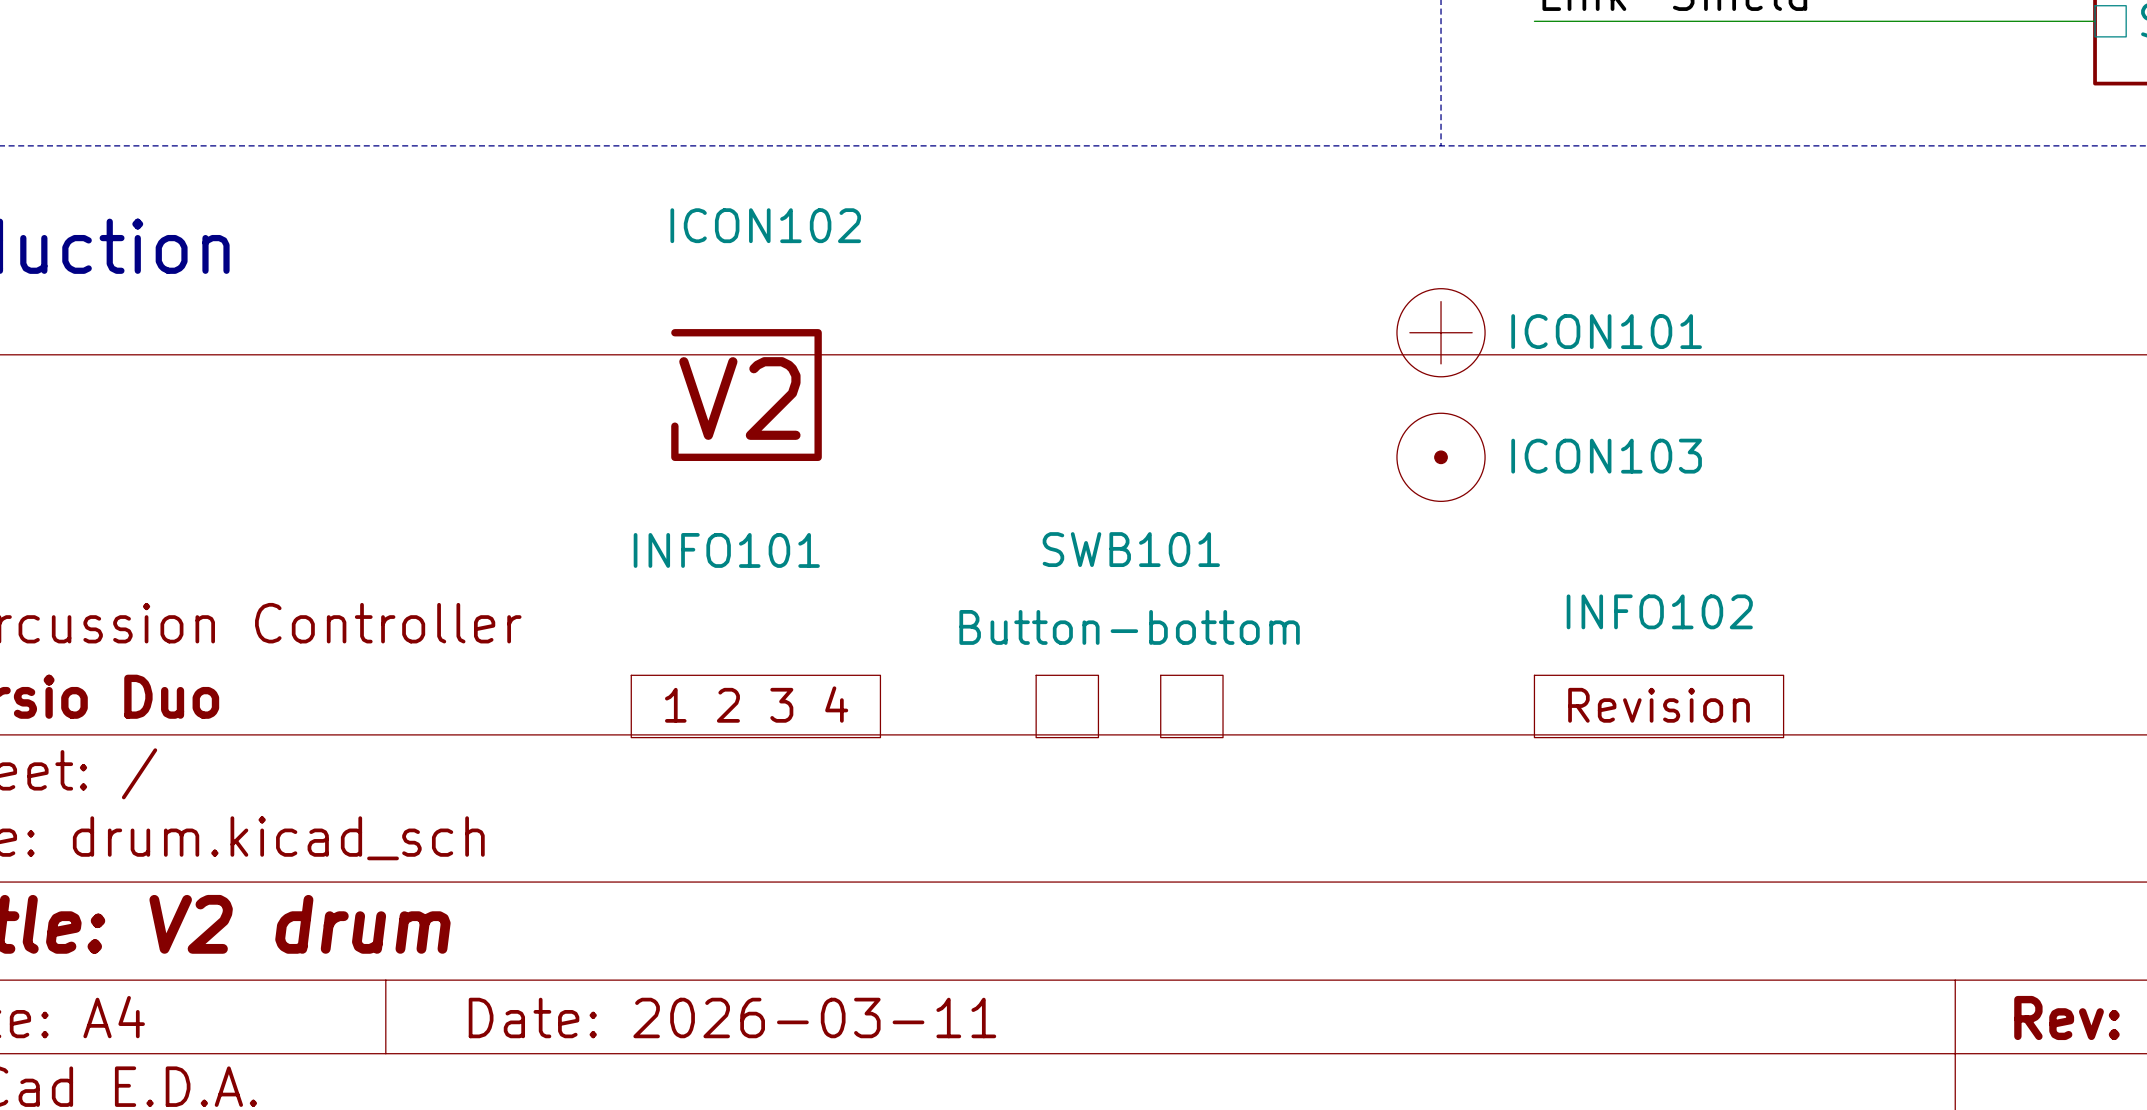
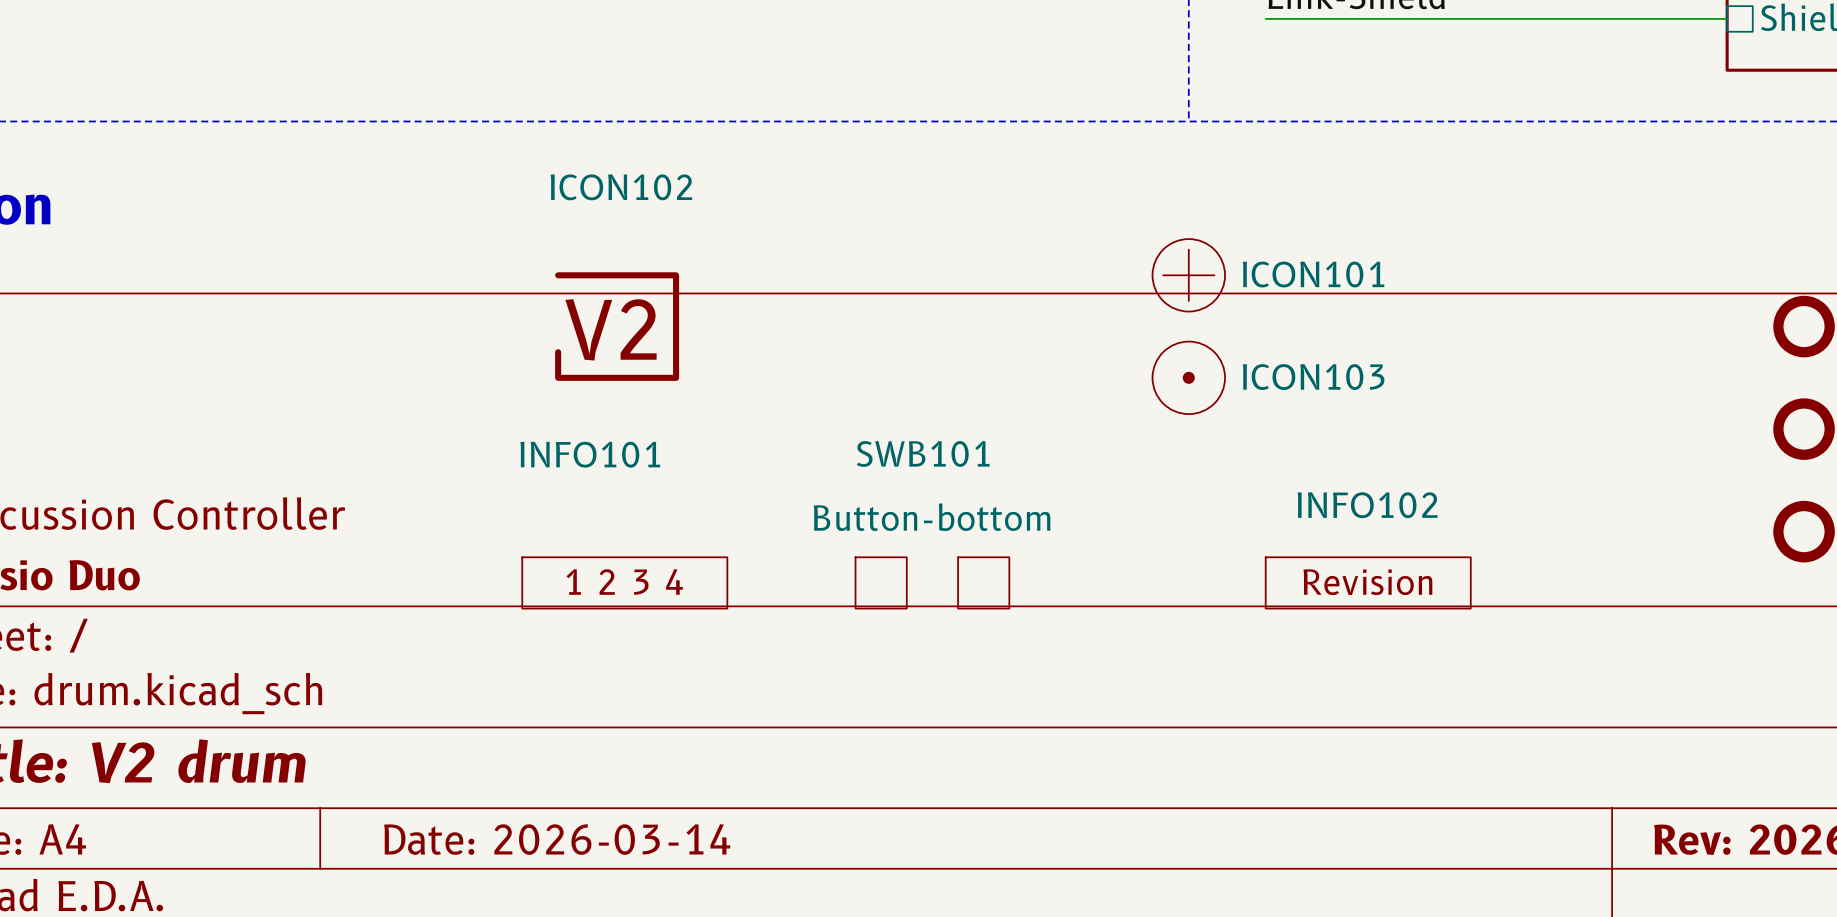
title block: Date: 2026-03-11 (732, 1017) -> Date: 2026-03-14 (557, 839)

